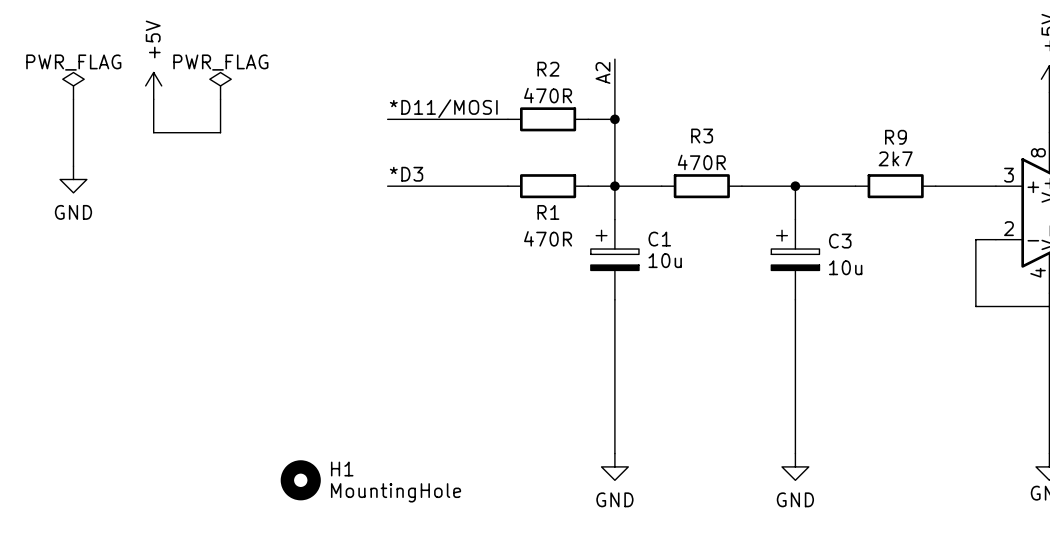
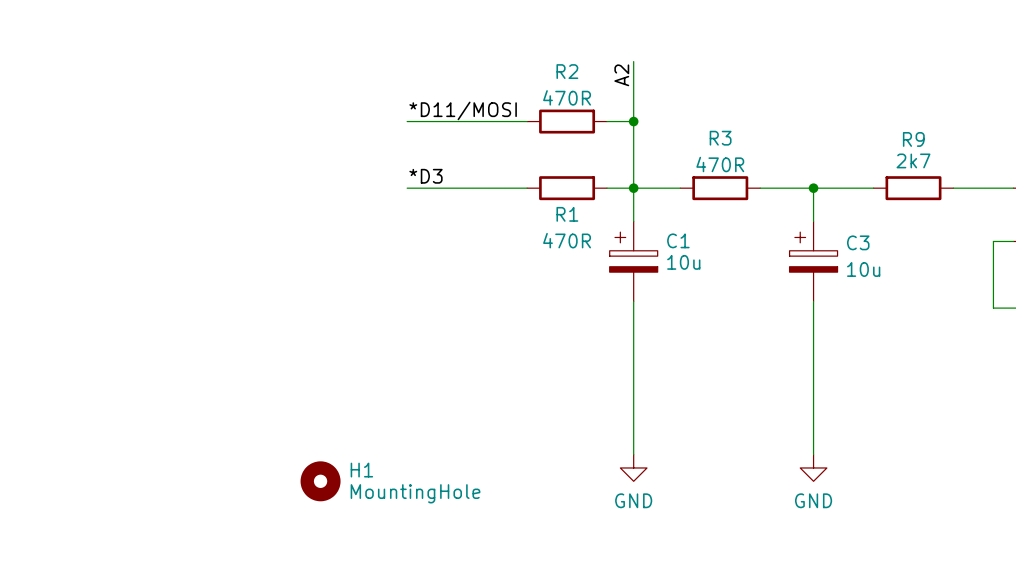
power symbol: PWR_FLAG (73, 85) -> none
power symbol: +5V (153, 85) -> none
power symbol: PWR_FLAG (220, 85) -> none
wire: (73, 99) (73, 166) -> none
wire: (153, 99) (153, 132) (220, 132) (220, 99) -> none
power symbol: GND (73, 179) -> none

